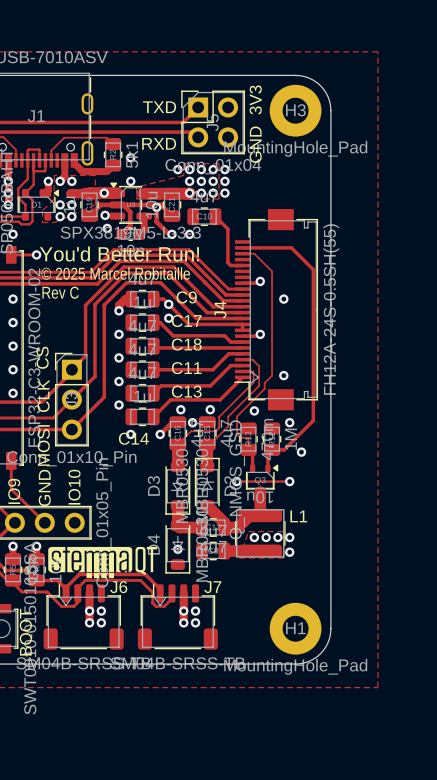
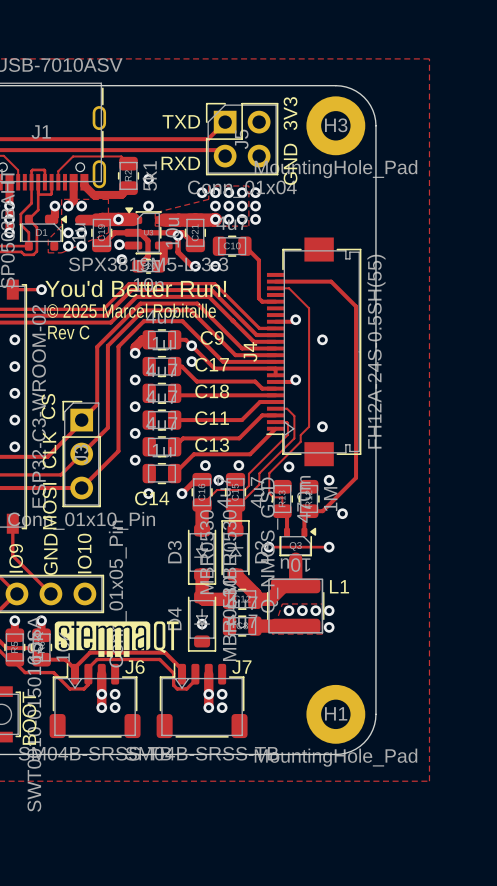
via: (13, 234) -> none

